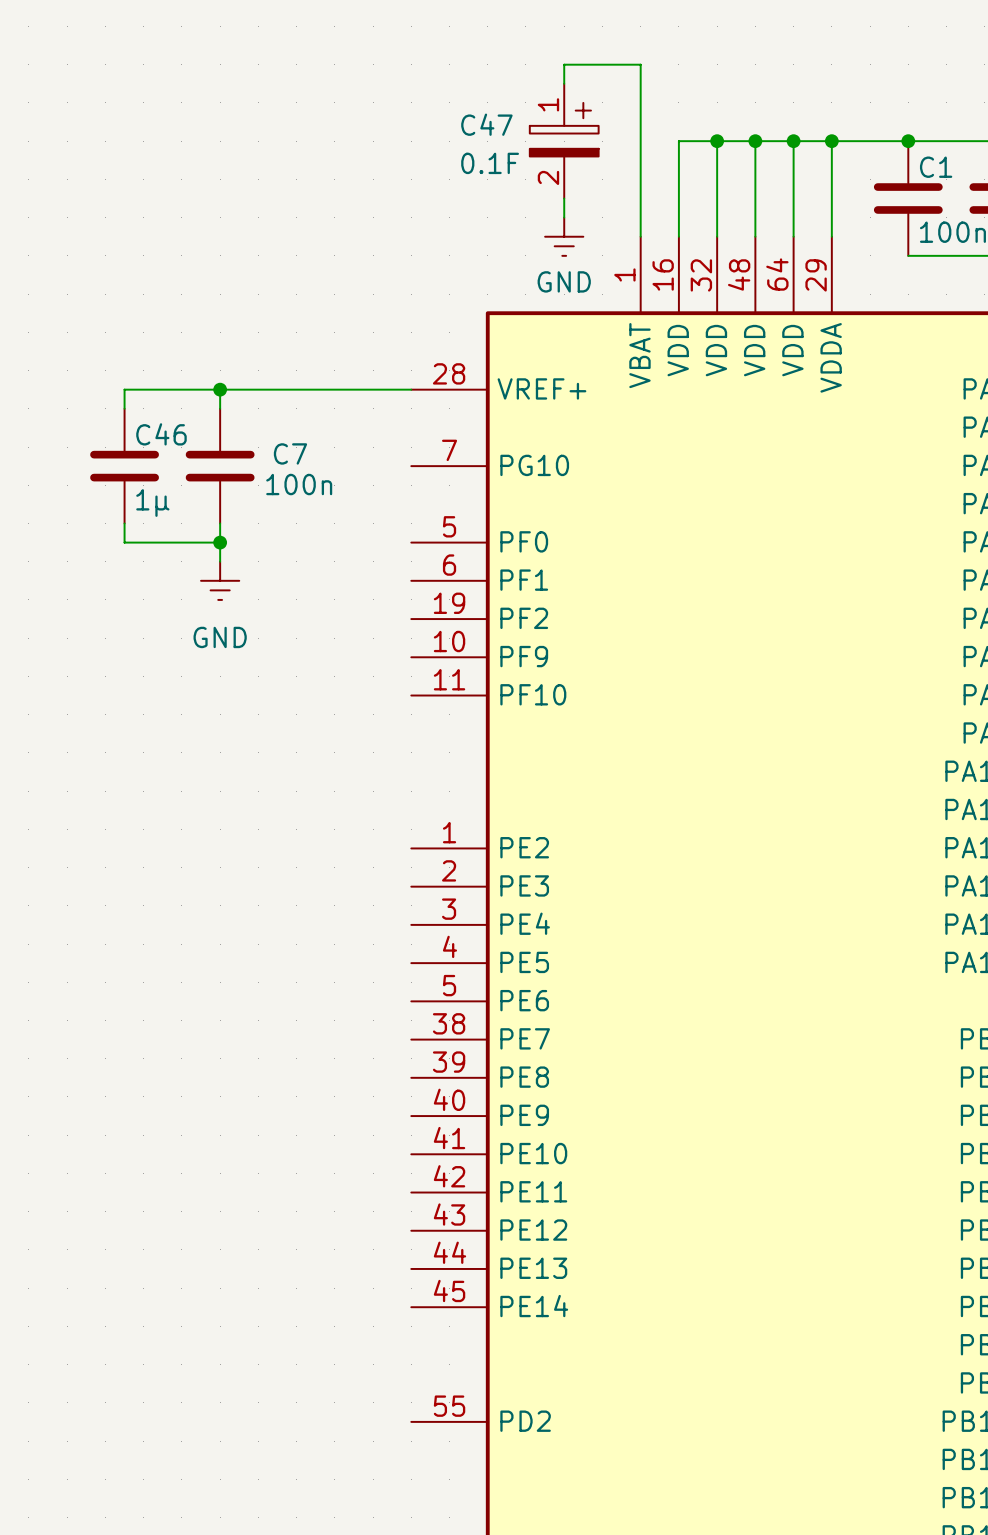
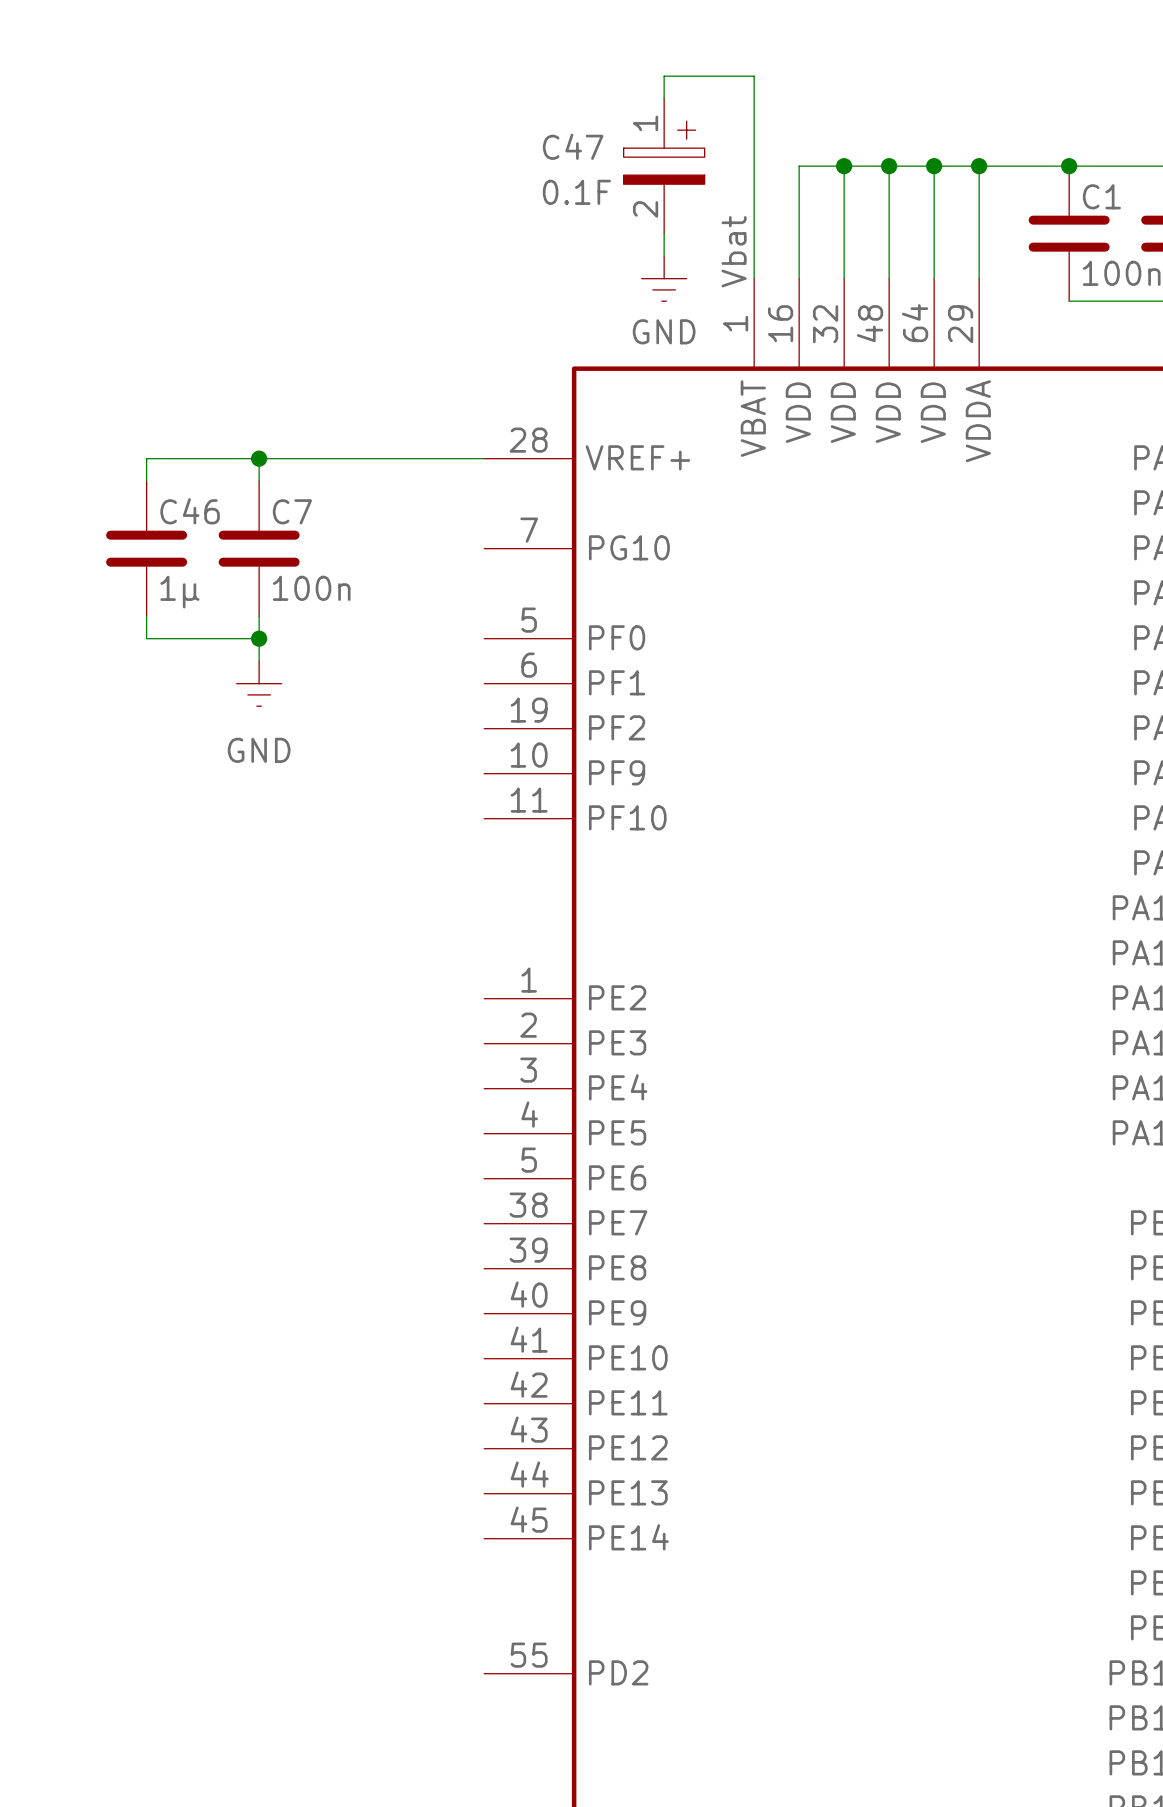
label: none -> Vbat (734, 251)
C7 name position: C7 (290, 453) -> C7 (292, 511)
C7 value position: 100n (299, 484) -> 100n (311, 588)

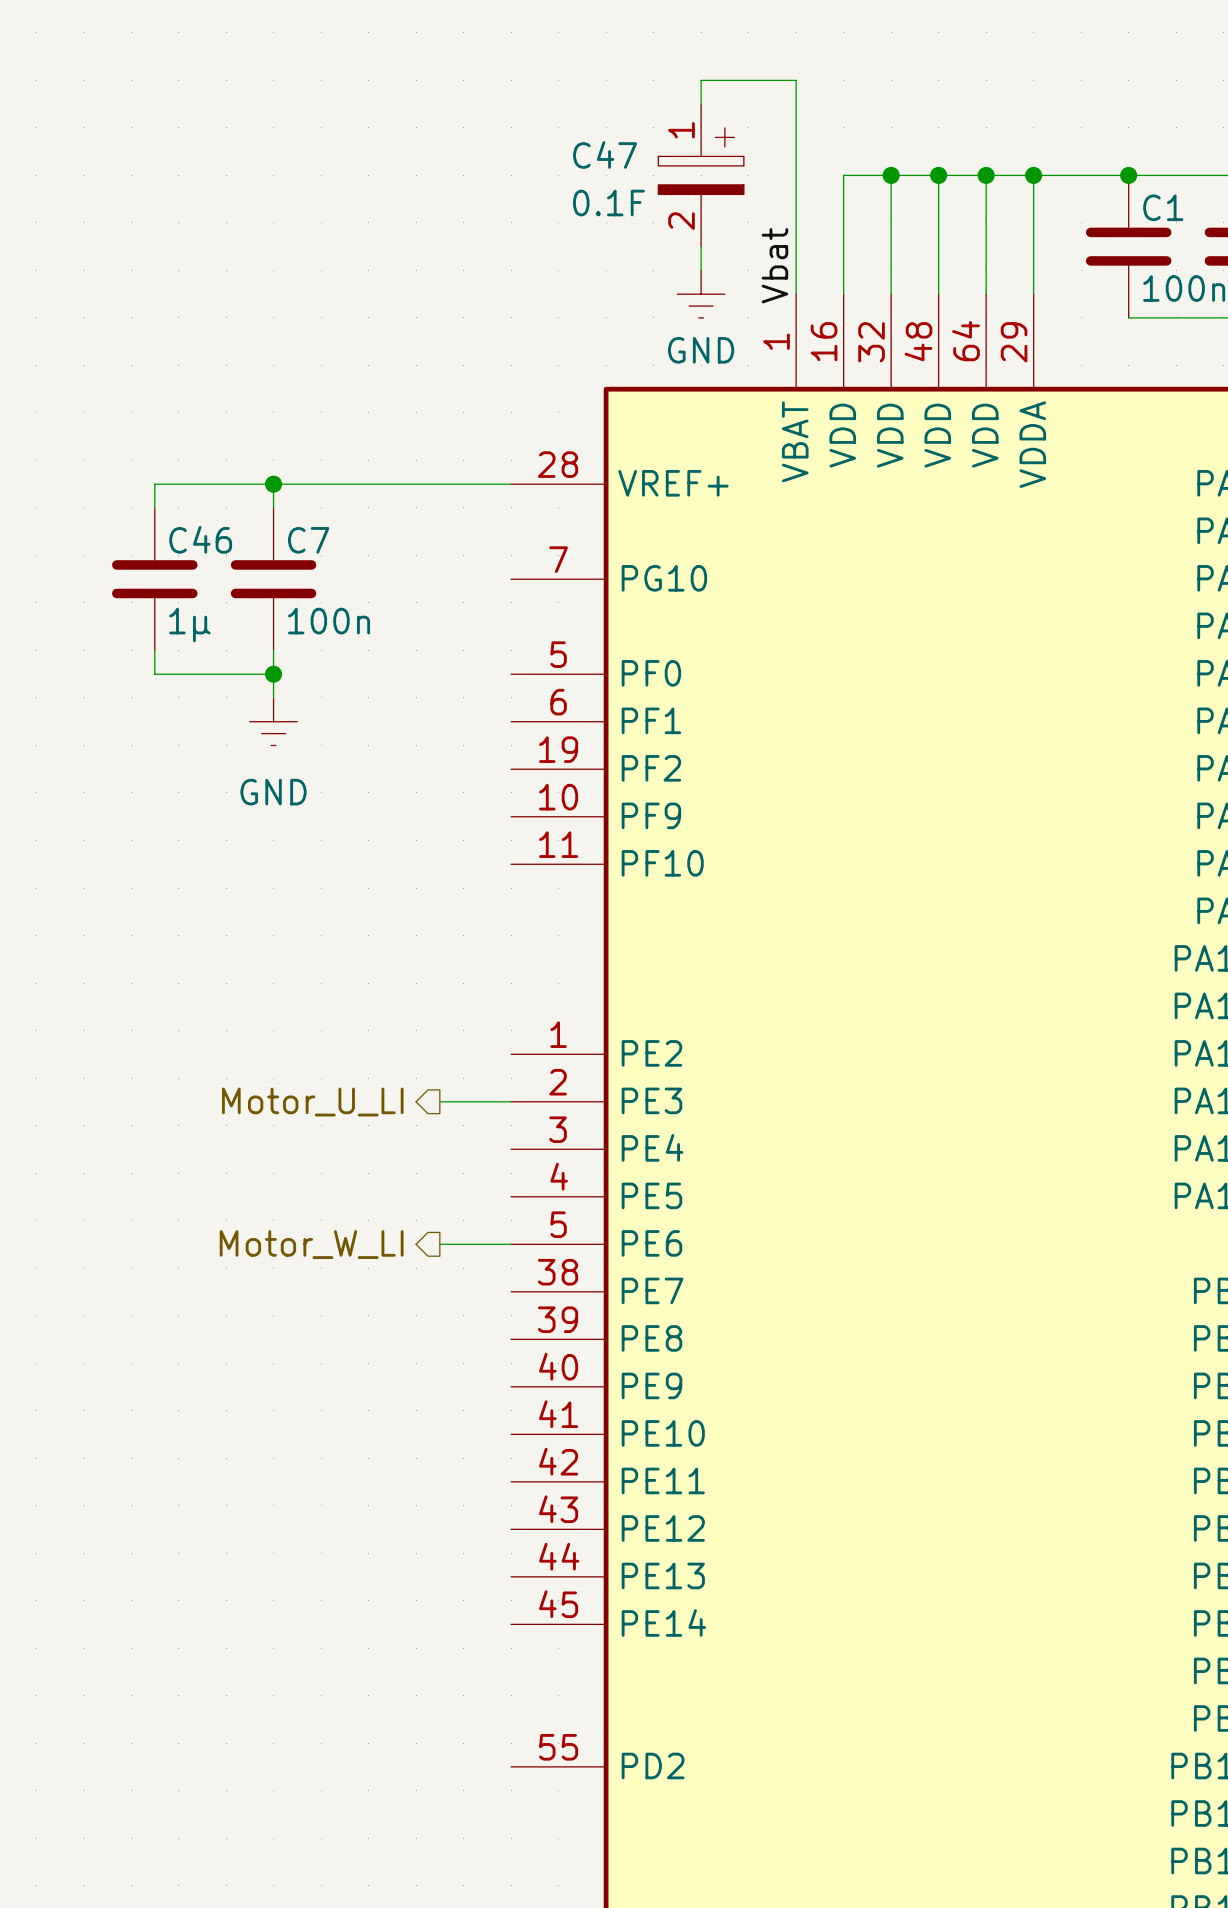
hierarchical label: none -> Motor_U_LI (312, 1102)
wire: none -> (439, 1101) (511, 1101)
hierarchical label: none -> Motor_W_LI (311, 1244)
wire: none -> (439, 1244) (511, 1244)

